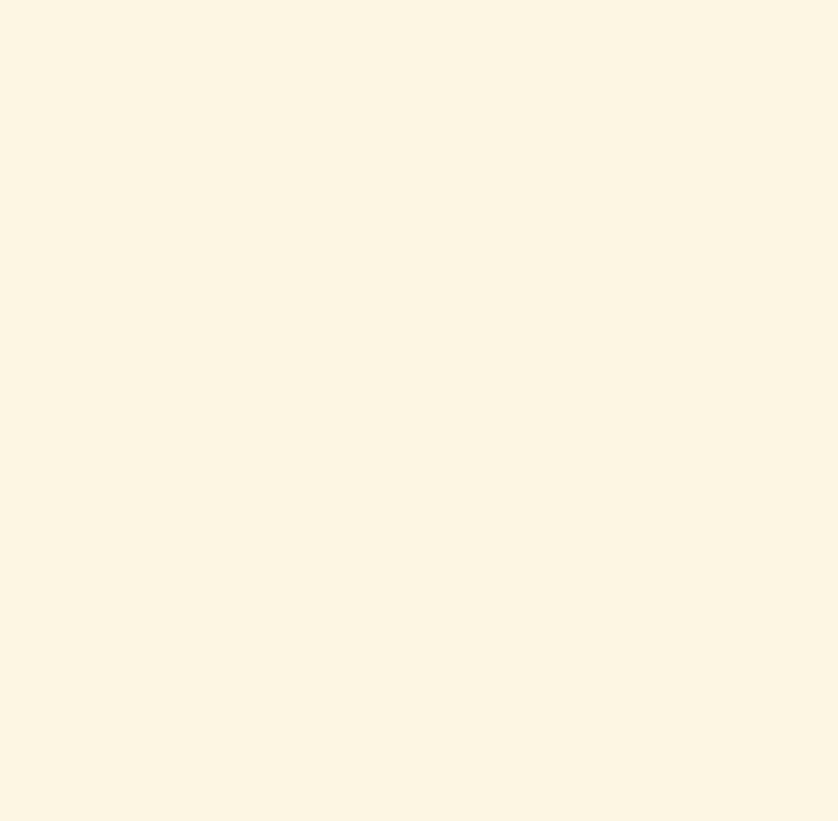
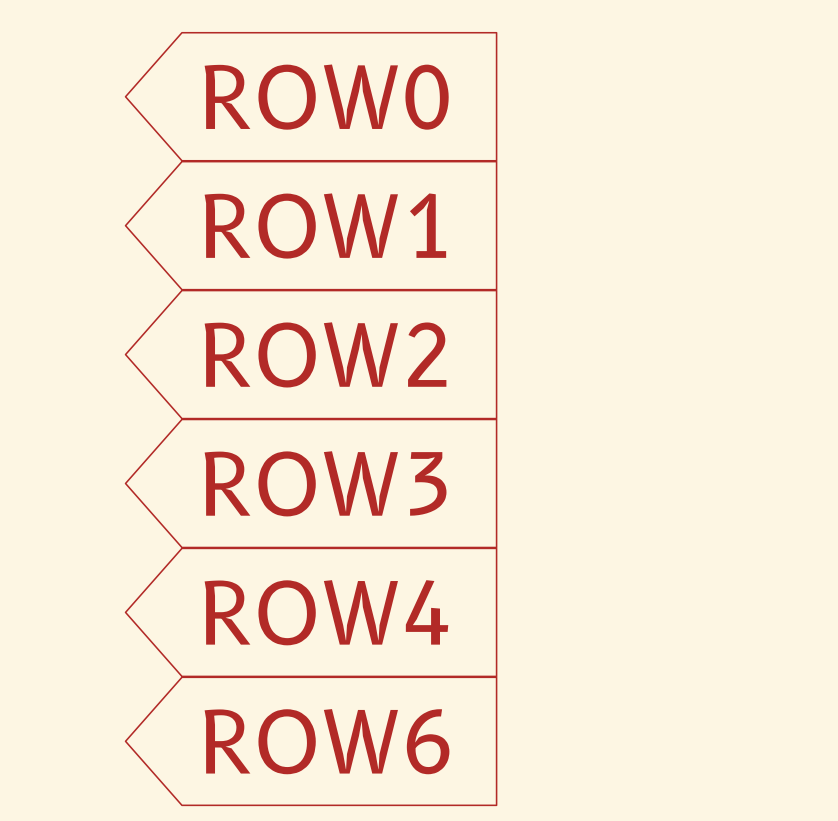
global label: none -> ROW0 (326, 97)
global label: none -> ROW1 (325, 226)
global label: none -> ROW2 (325, 354)
global label: none -> ROW3 (325, 483)
global label: none -> ROW4 (326, 612)
global label: none -> ROW6 (327, 741)

